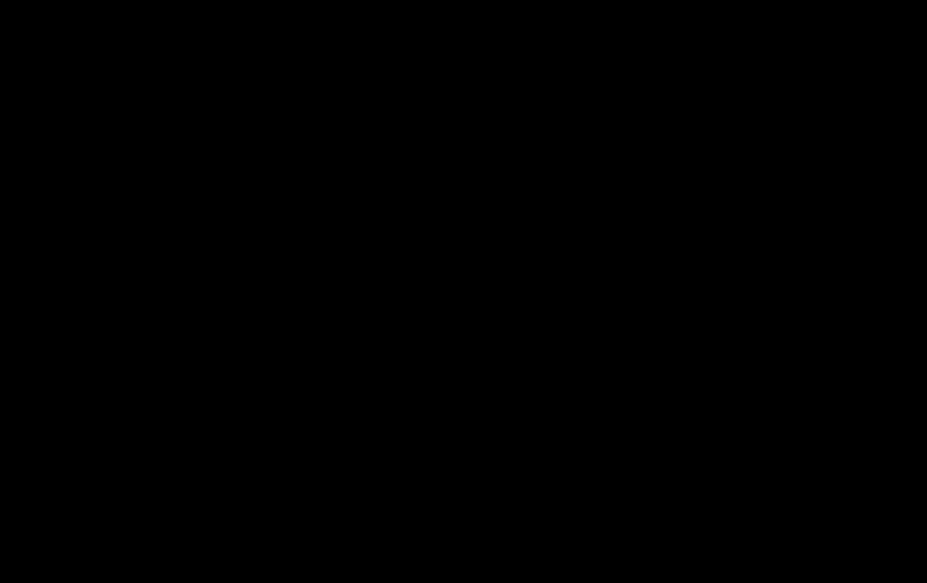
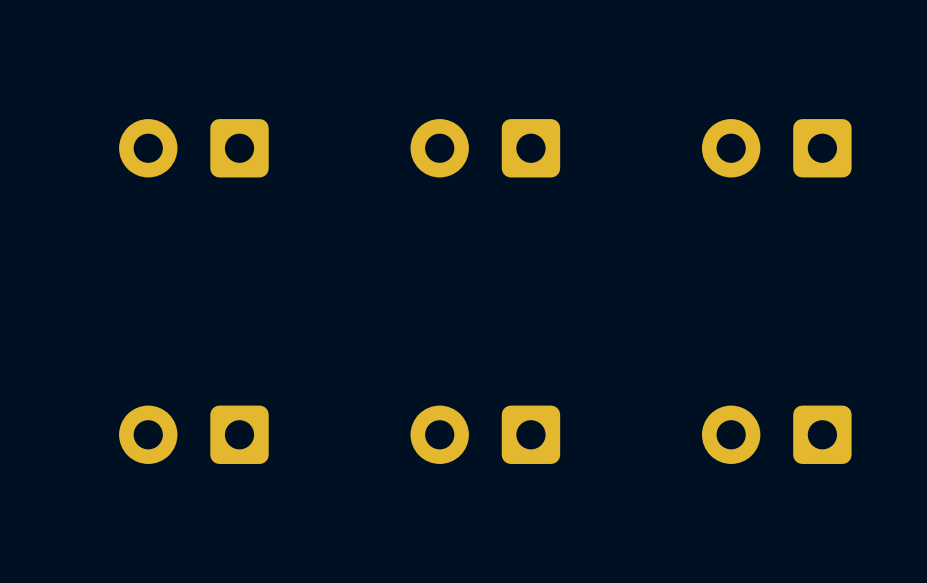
part: none -> (193, 148)
part: none -> (485, 148)
part: none -> (776, 148)
part: none -> (193, 434)
part: none -> (485, 434)
part: none -> (776, 434)

